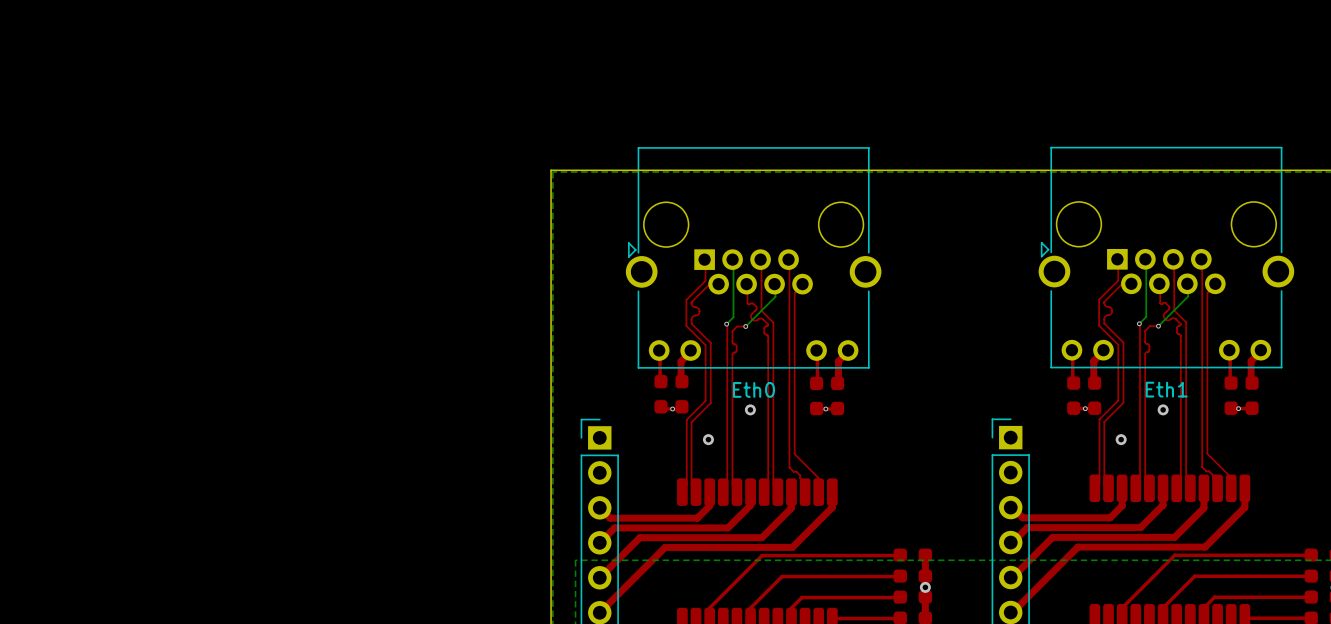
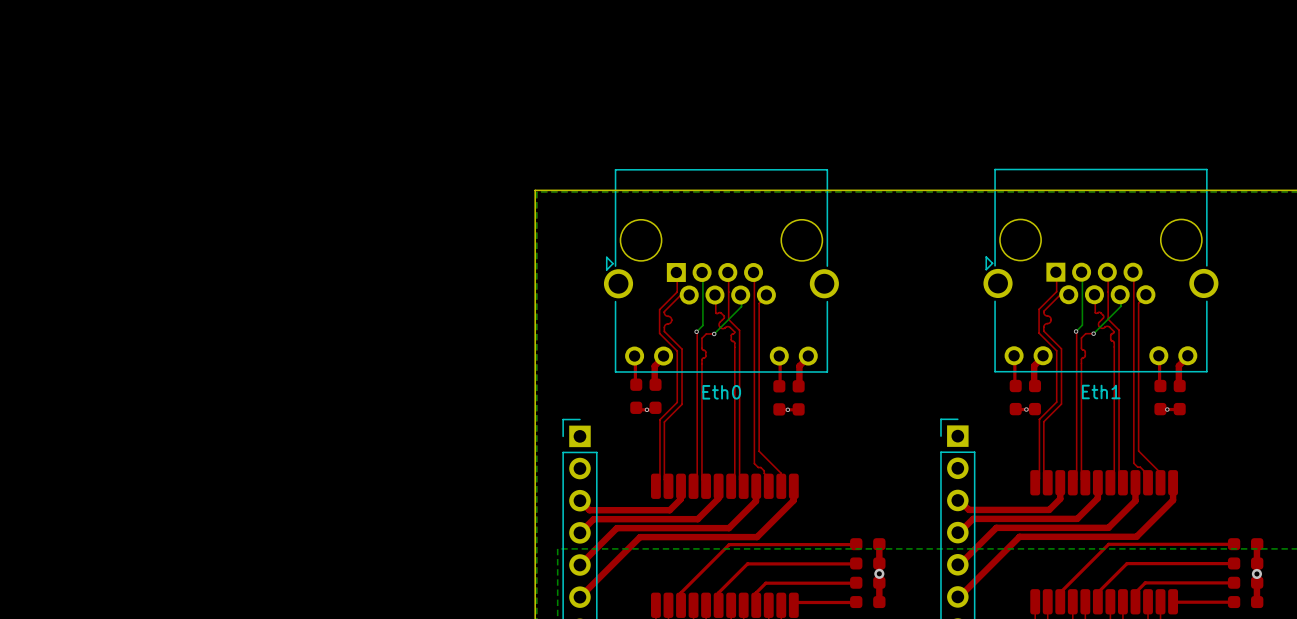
via: (750, 409) -> none
via: (1163, 409) -> none
via: (708, 439) -> none
via: (1121, 439) -> none

